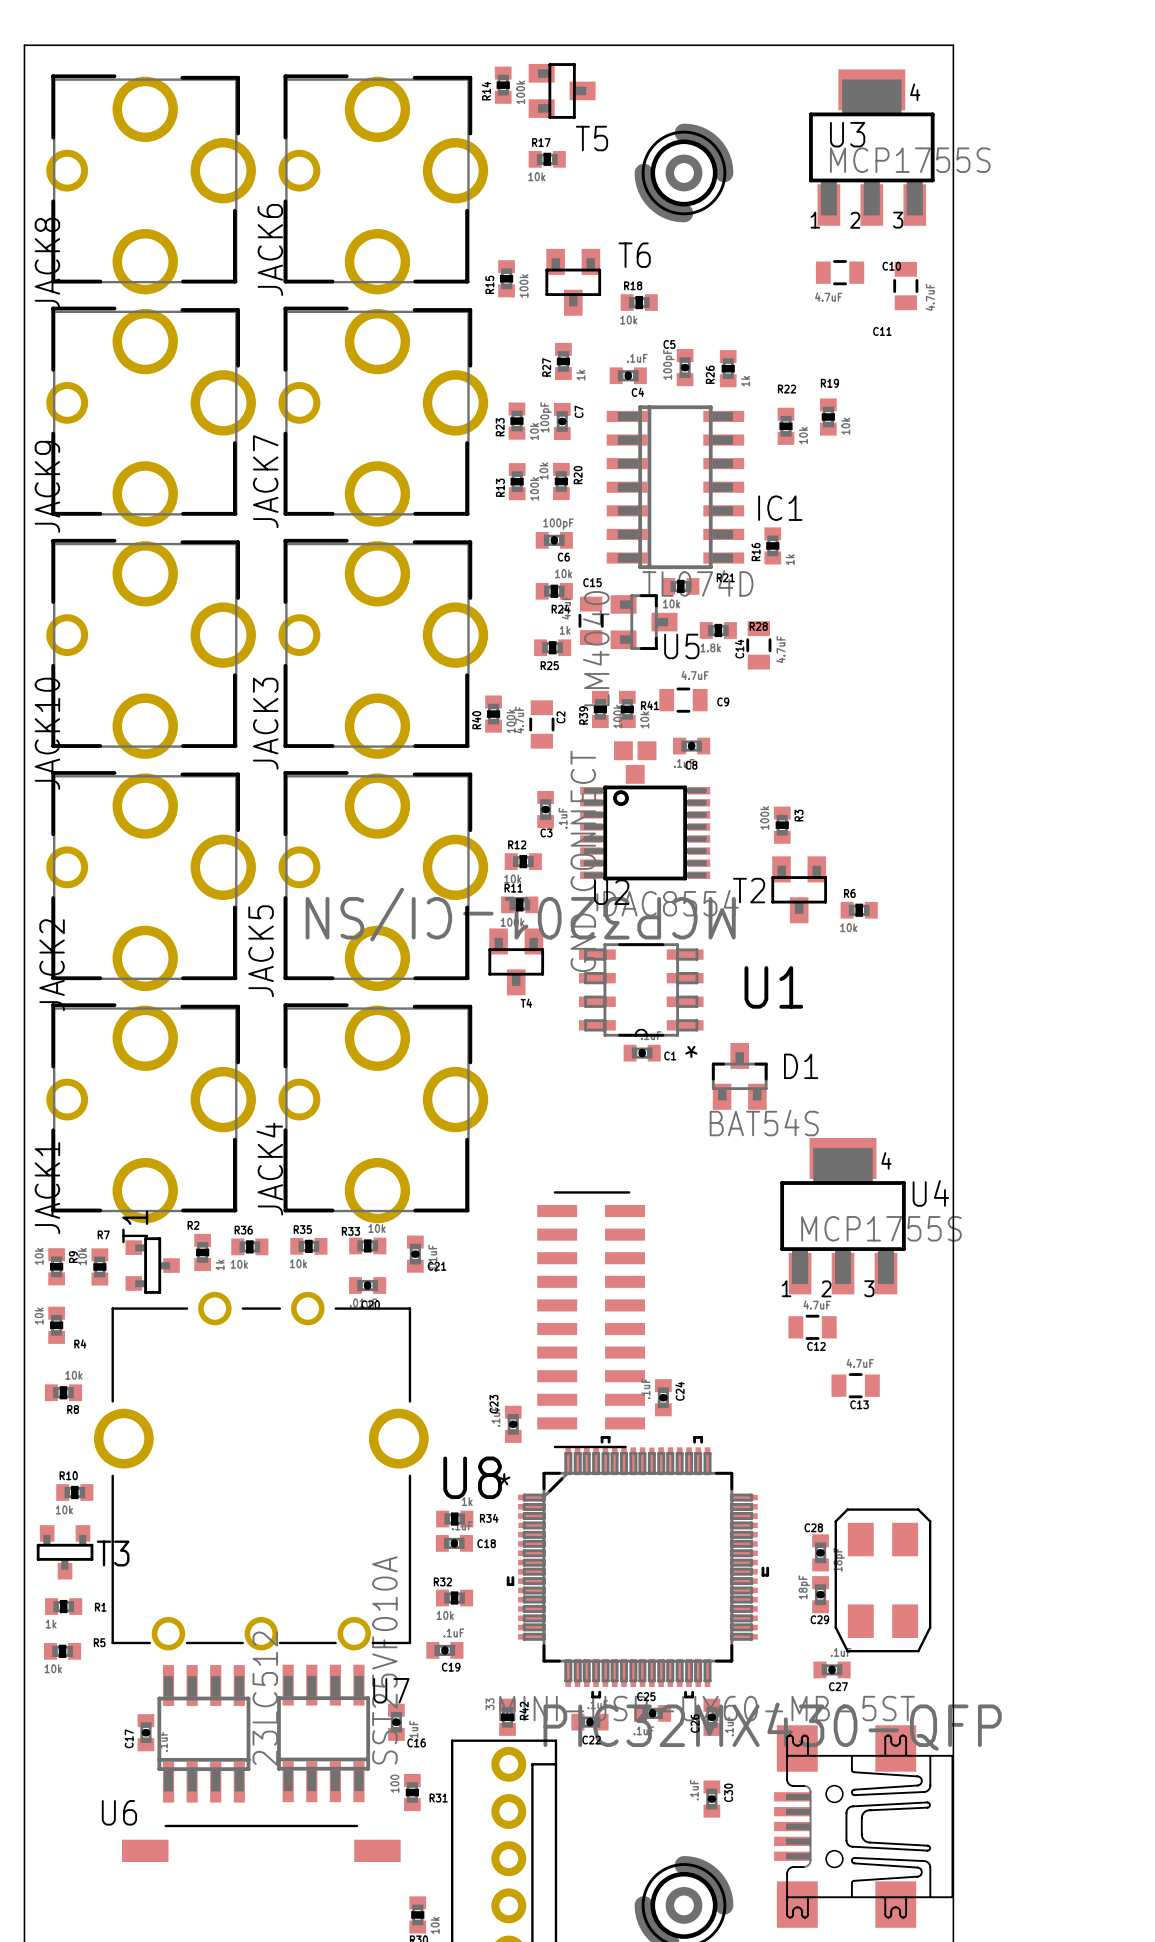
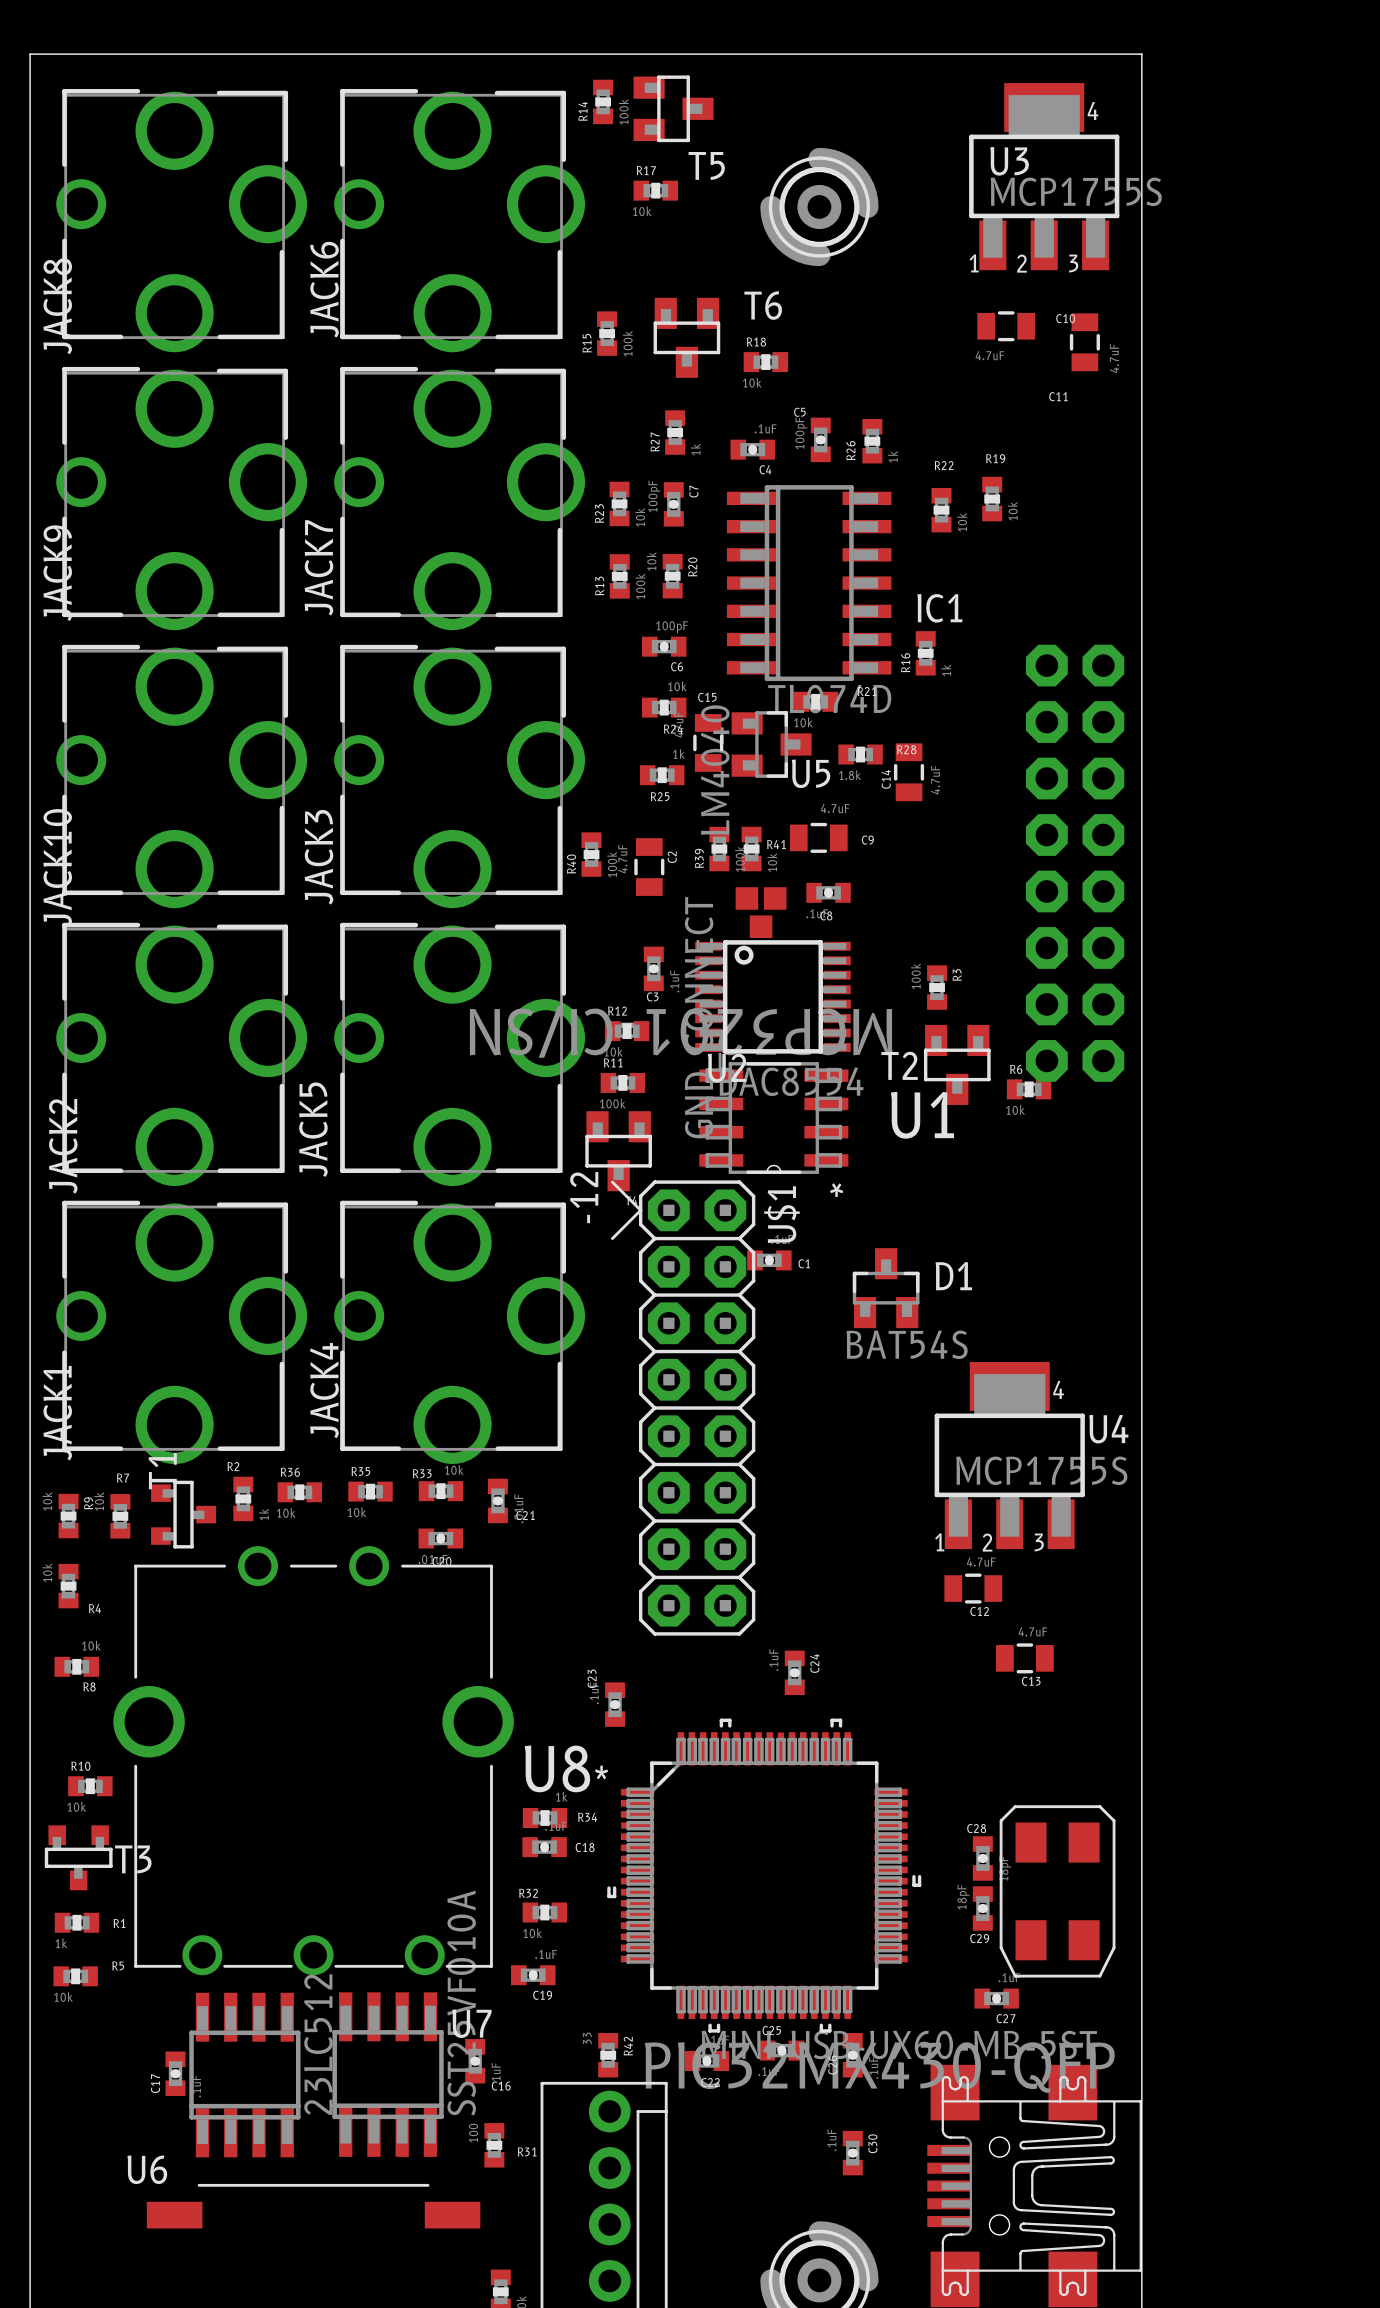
part: none -> (1075, 863)
U1 position: (641, 989) -> (773, 1118)
U$1: none -> (683, 1408)
part: (591, 1319) -> none

